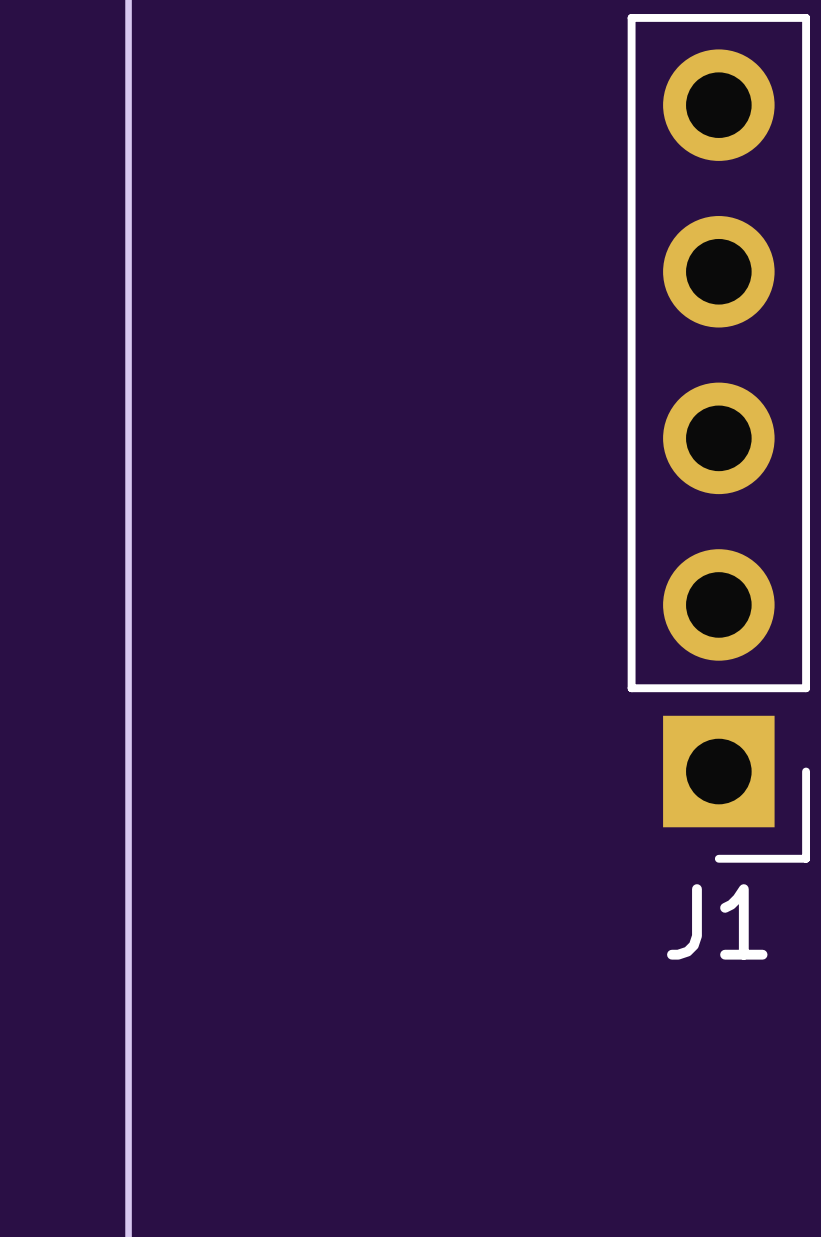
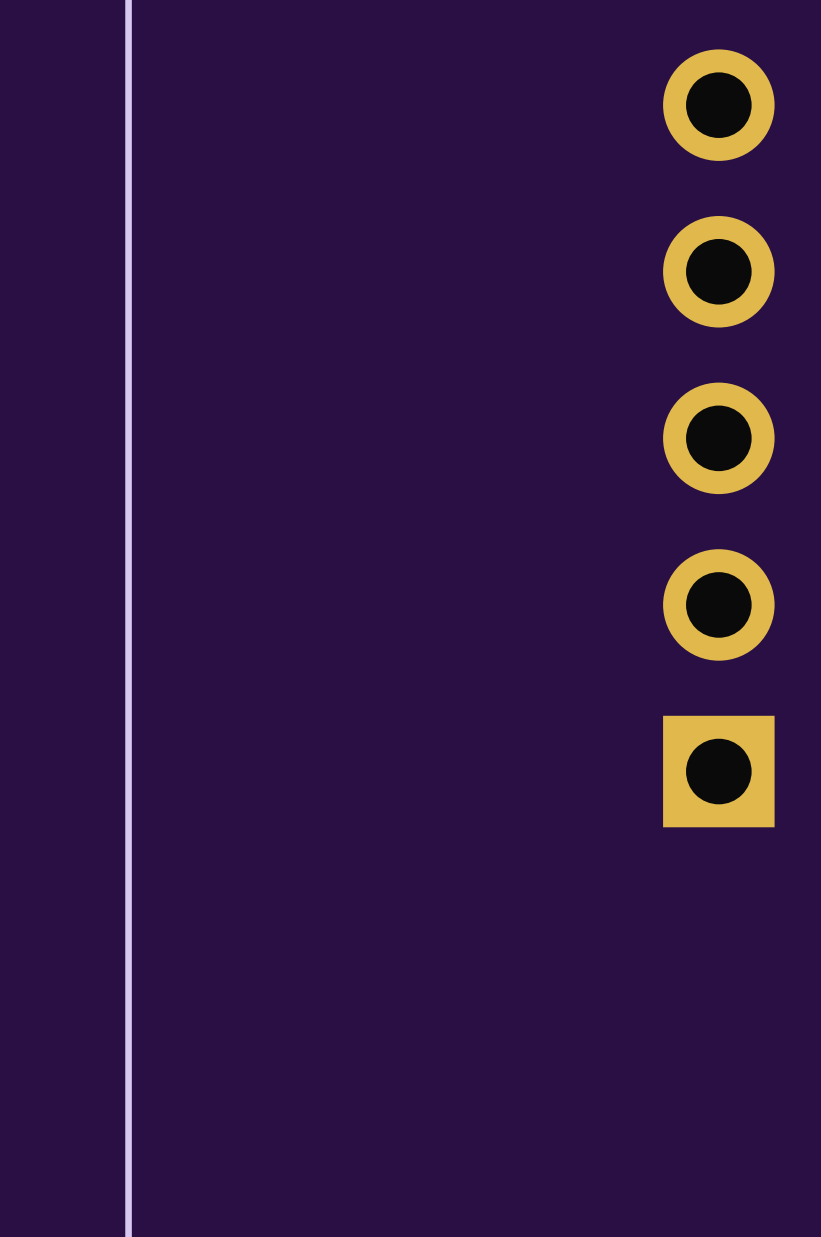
J1 side: top (718, 438) -> bottom (718, 438)

